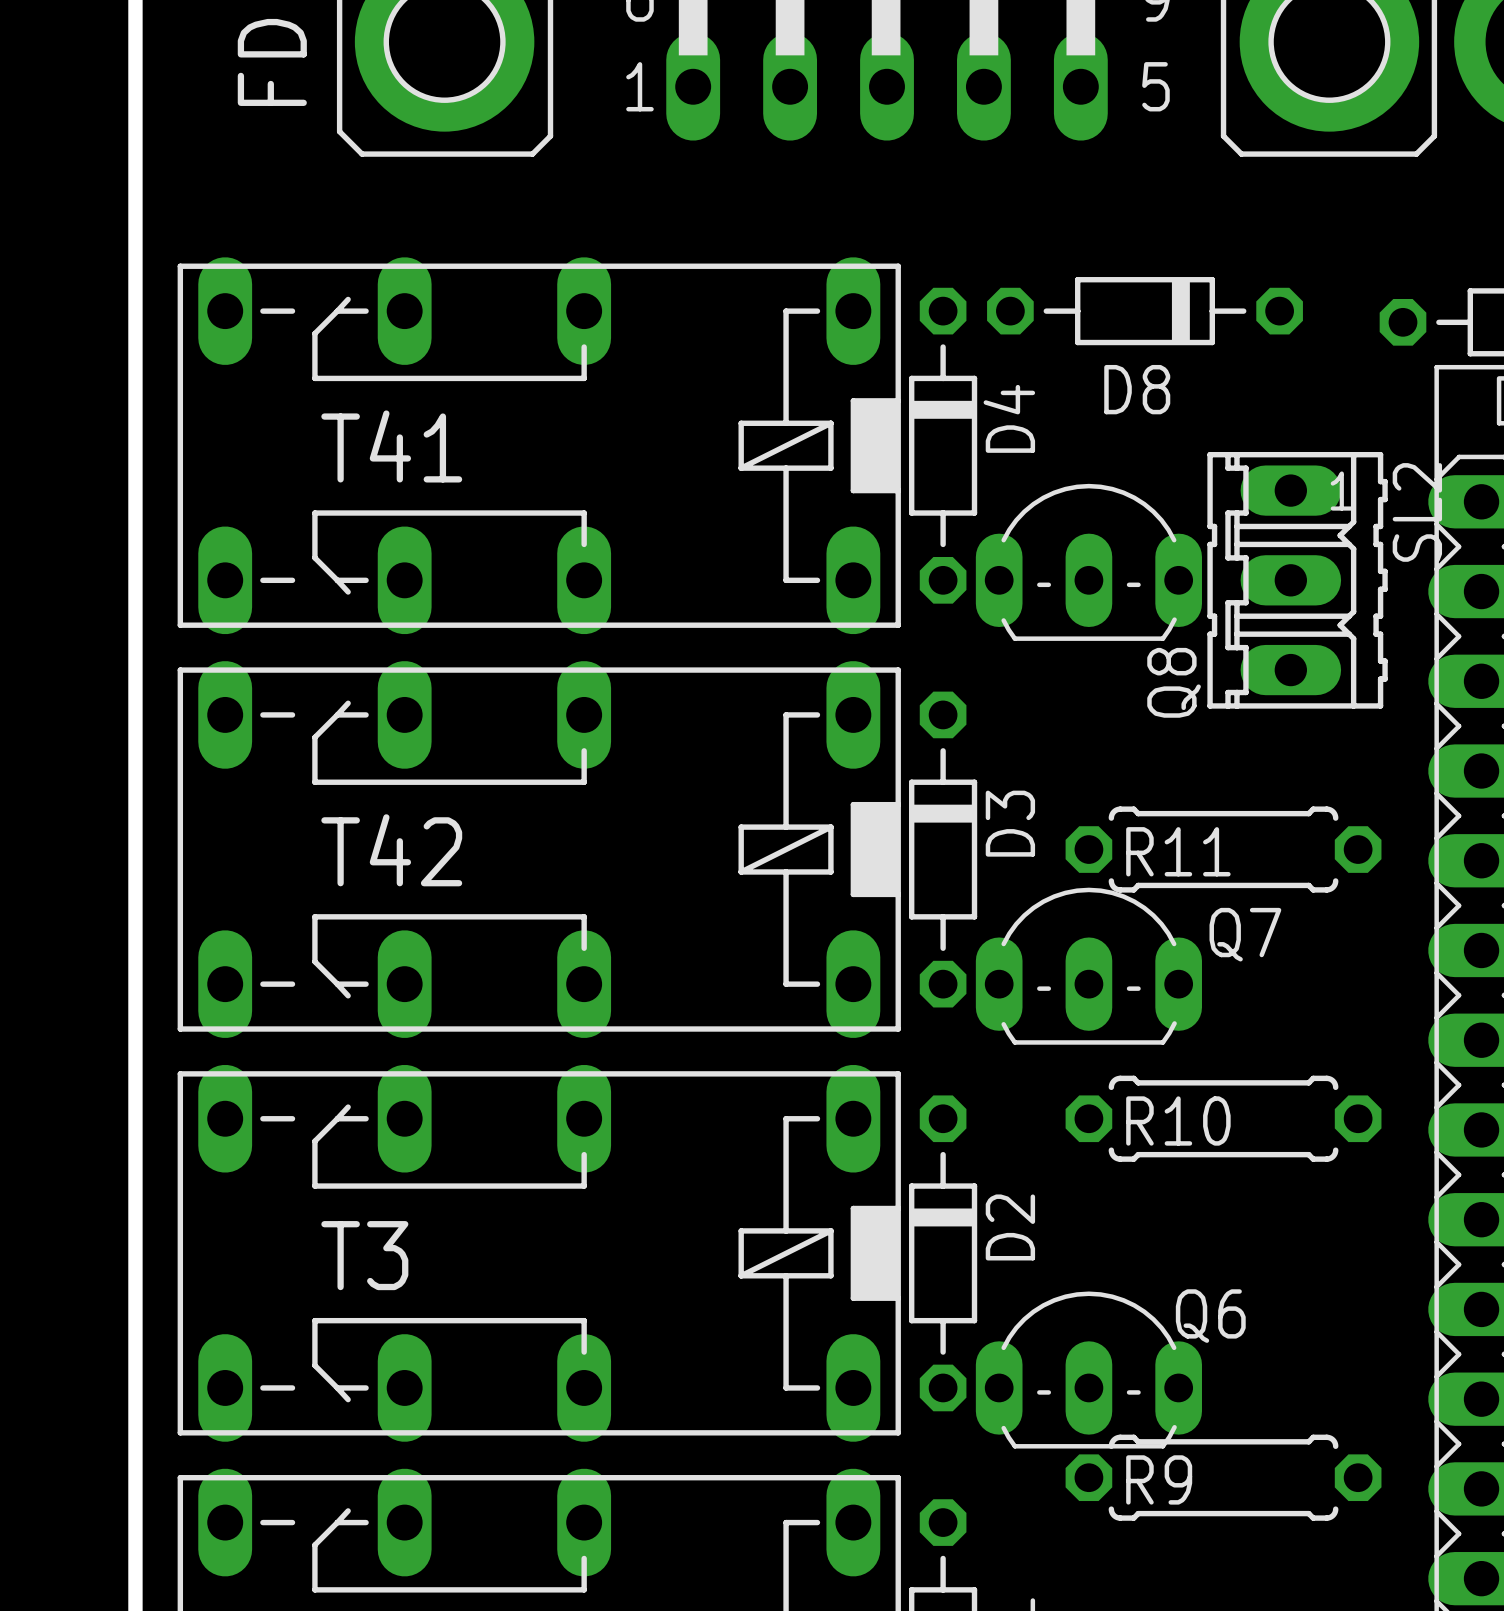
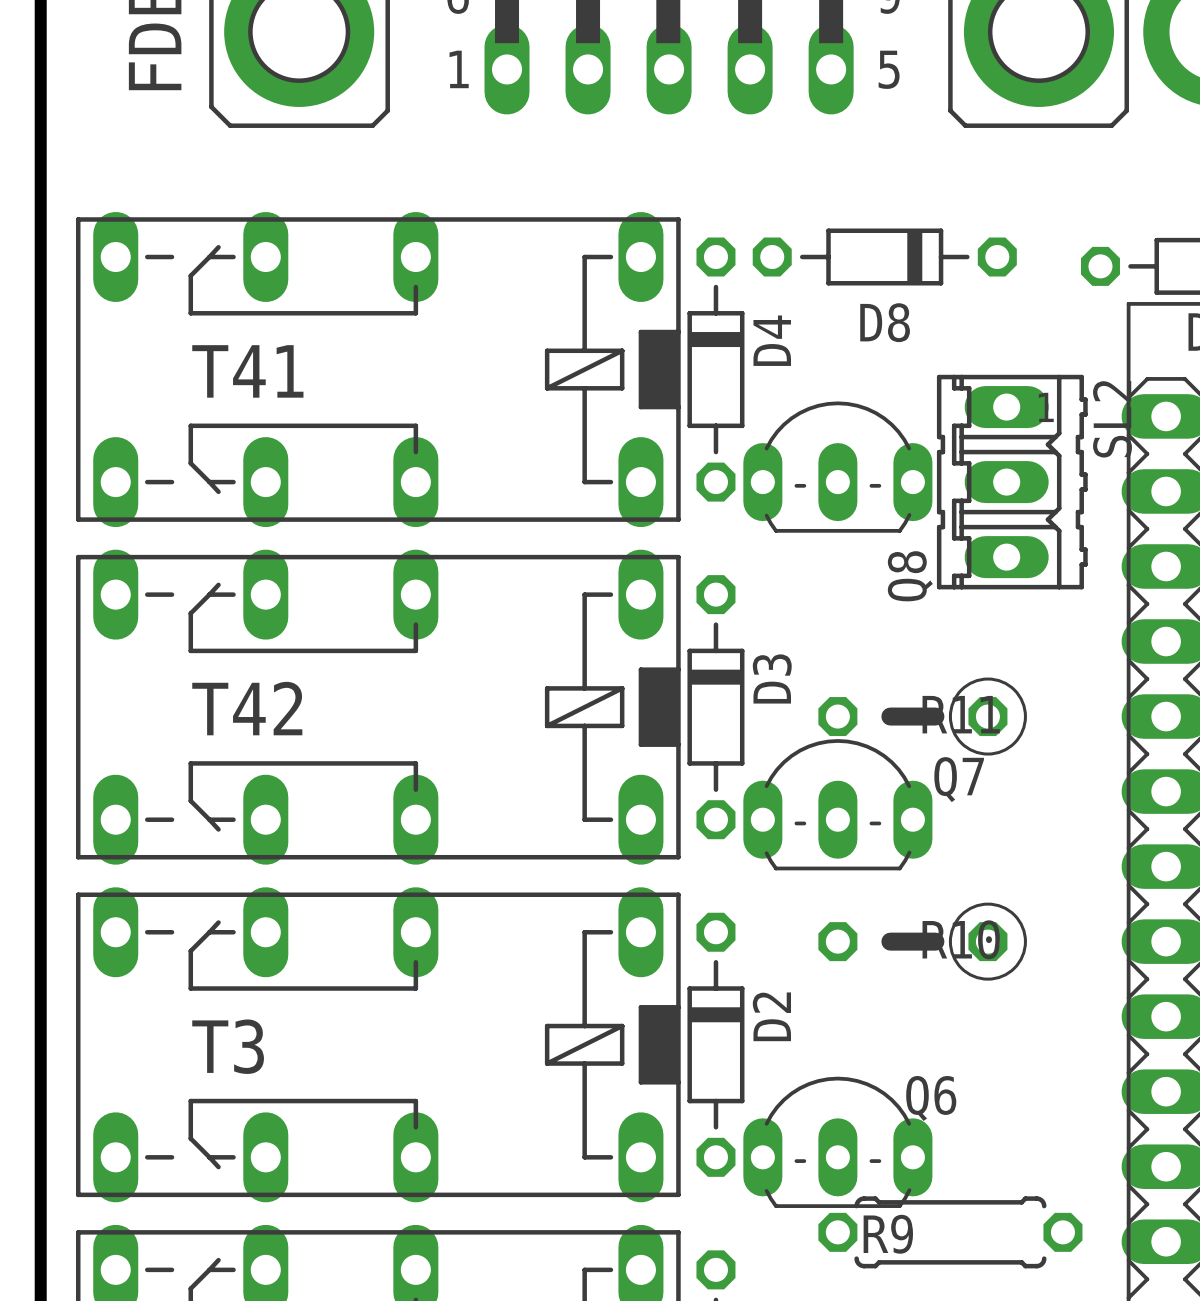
R11 footprint: [1065, 806, 1382, 893] -> [818, 677, 1027, 756]
R10 footprint: [1065, 1075, 1382, 1162] -> [818, 902, 1027, 981]

